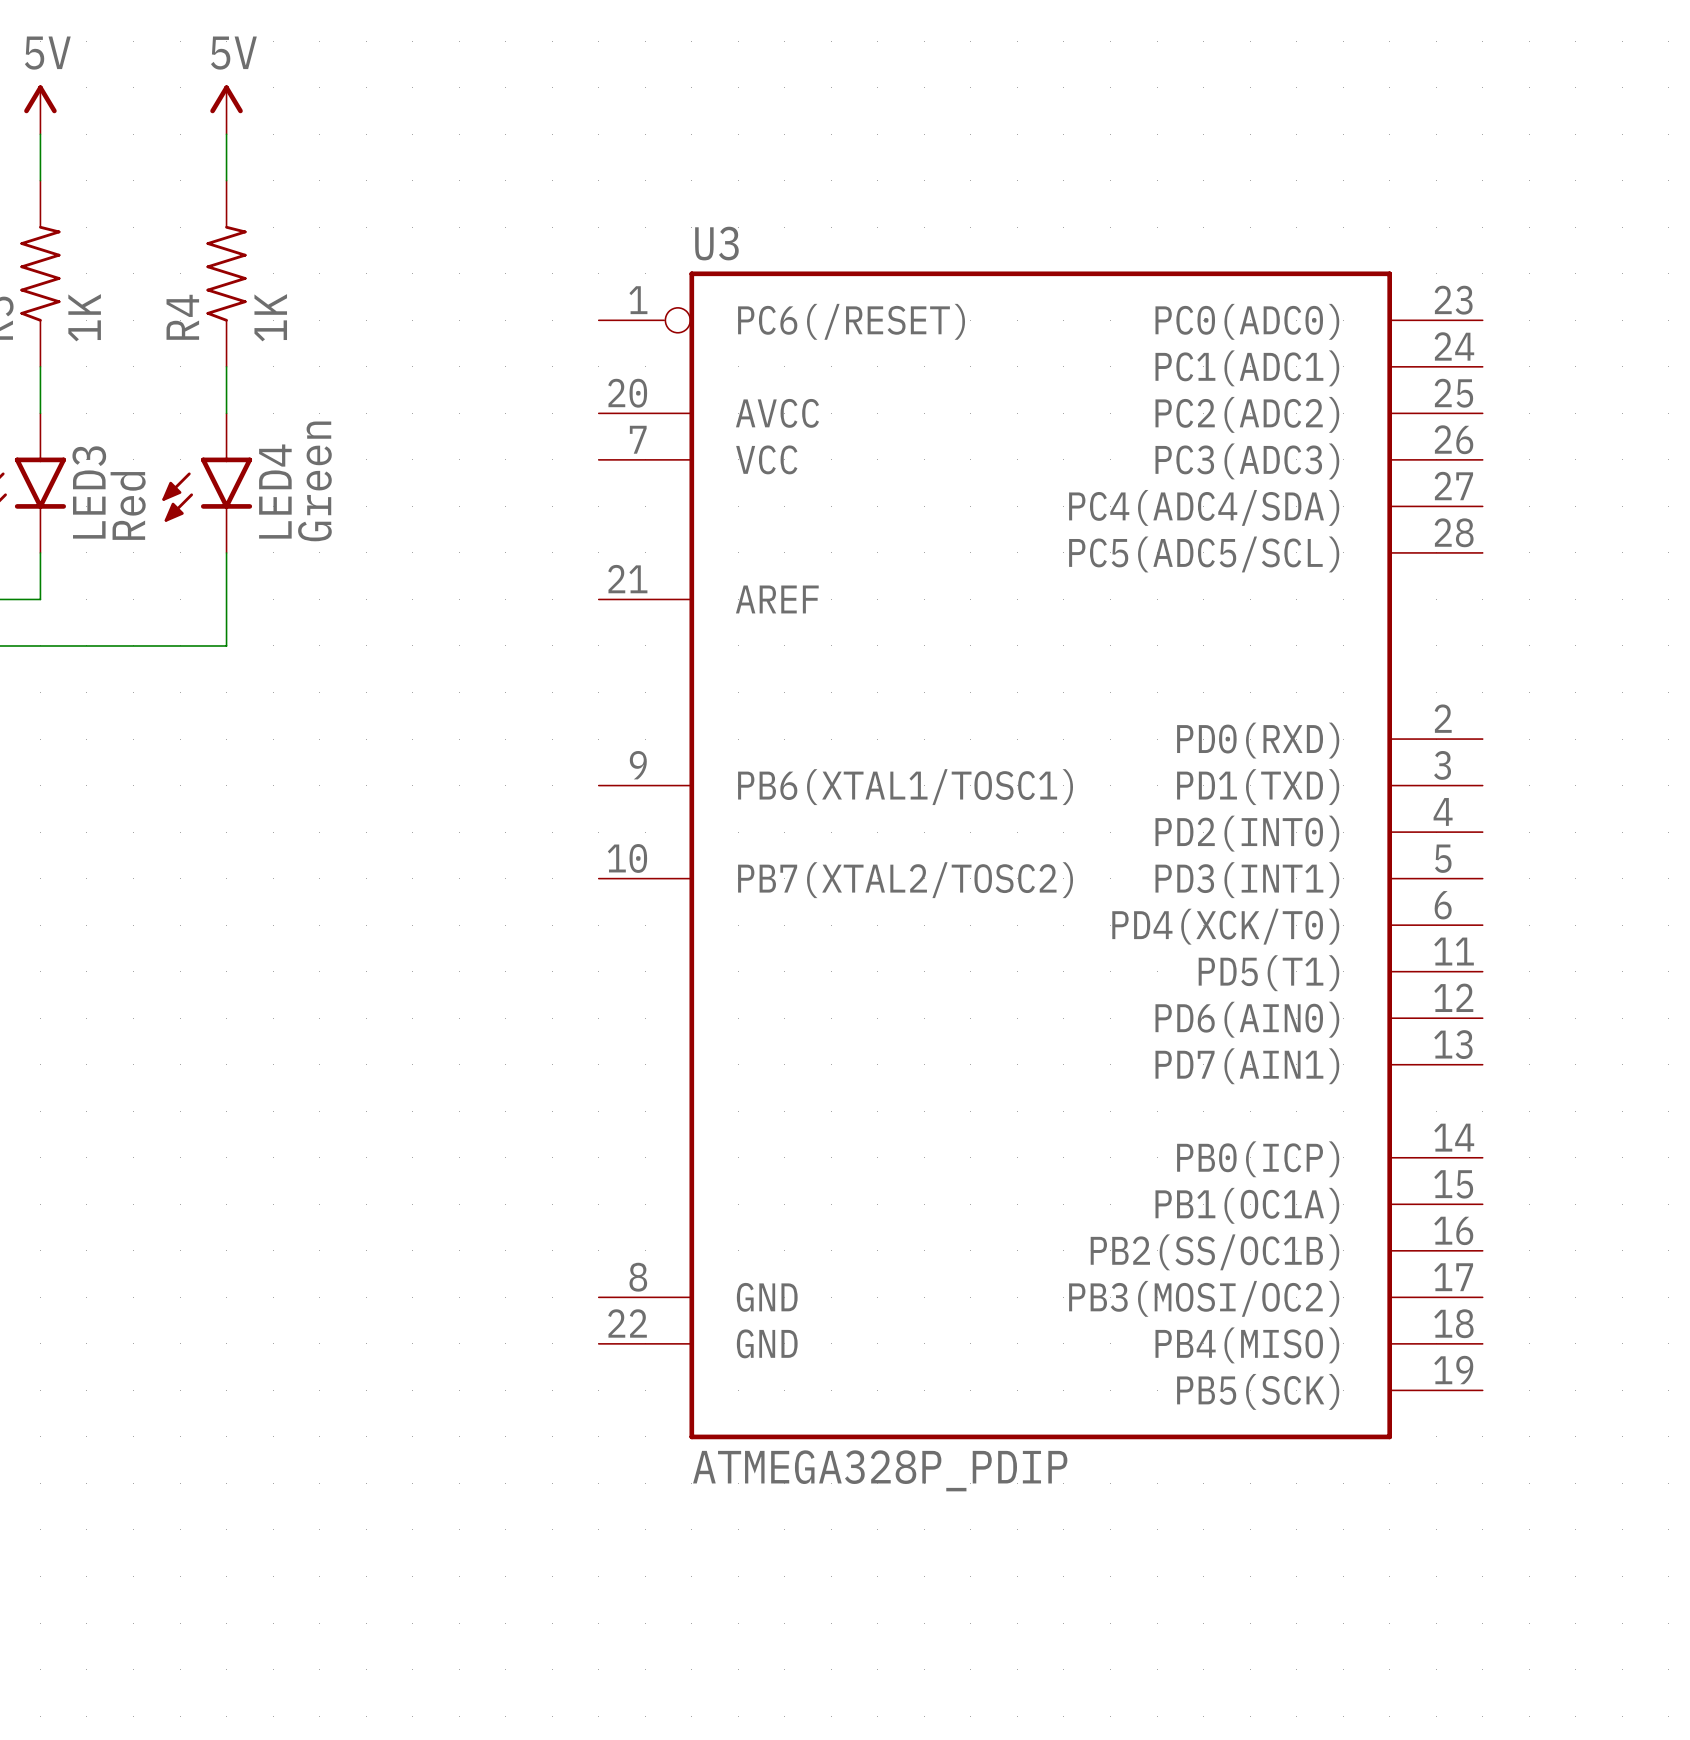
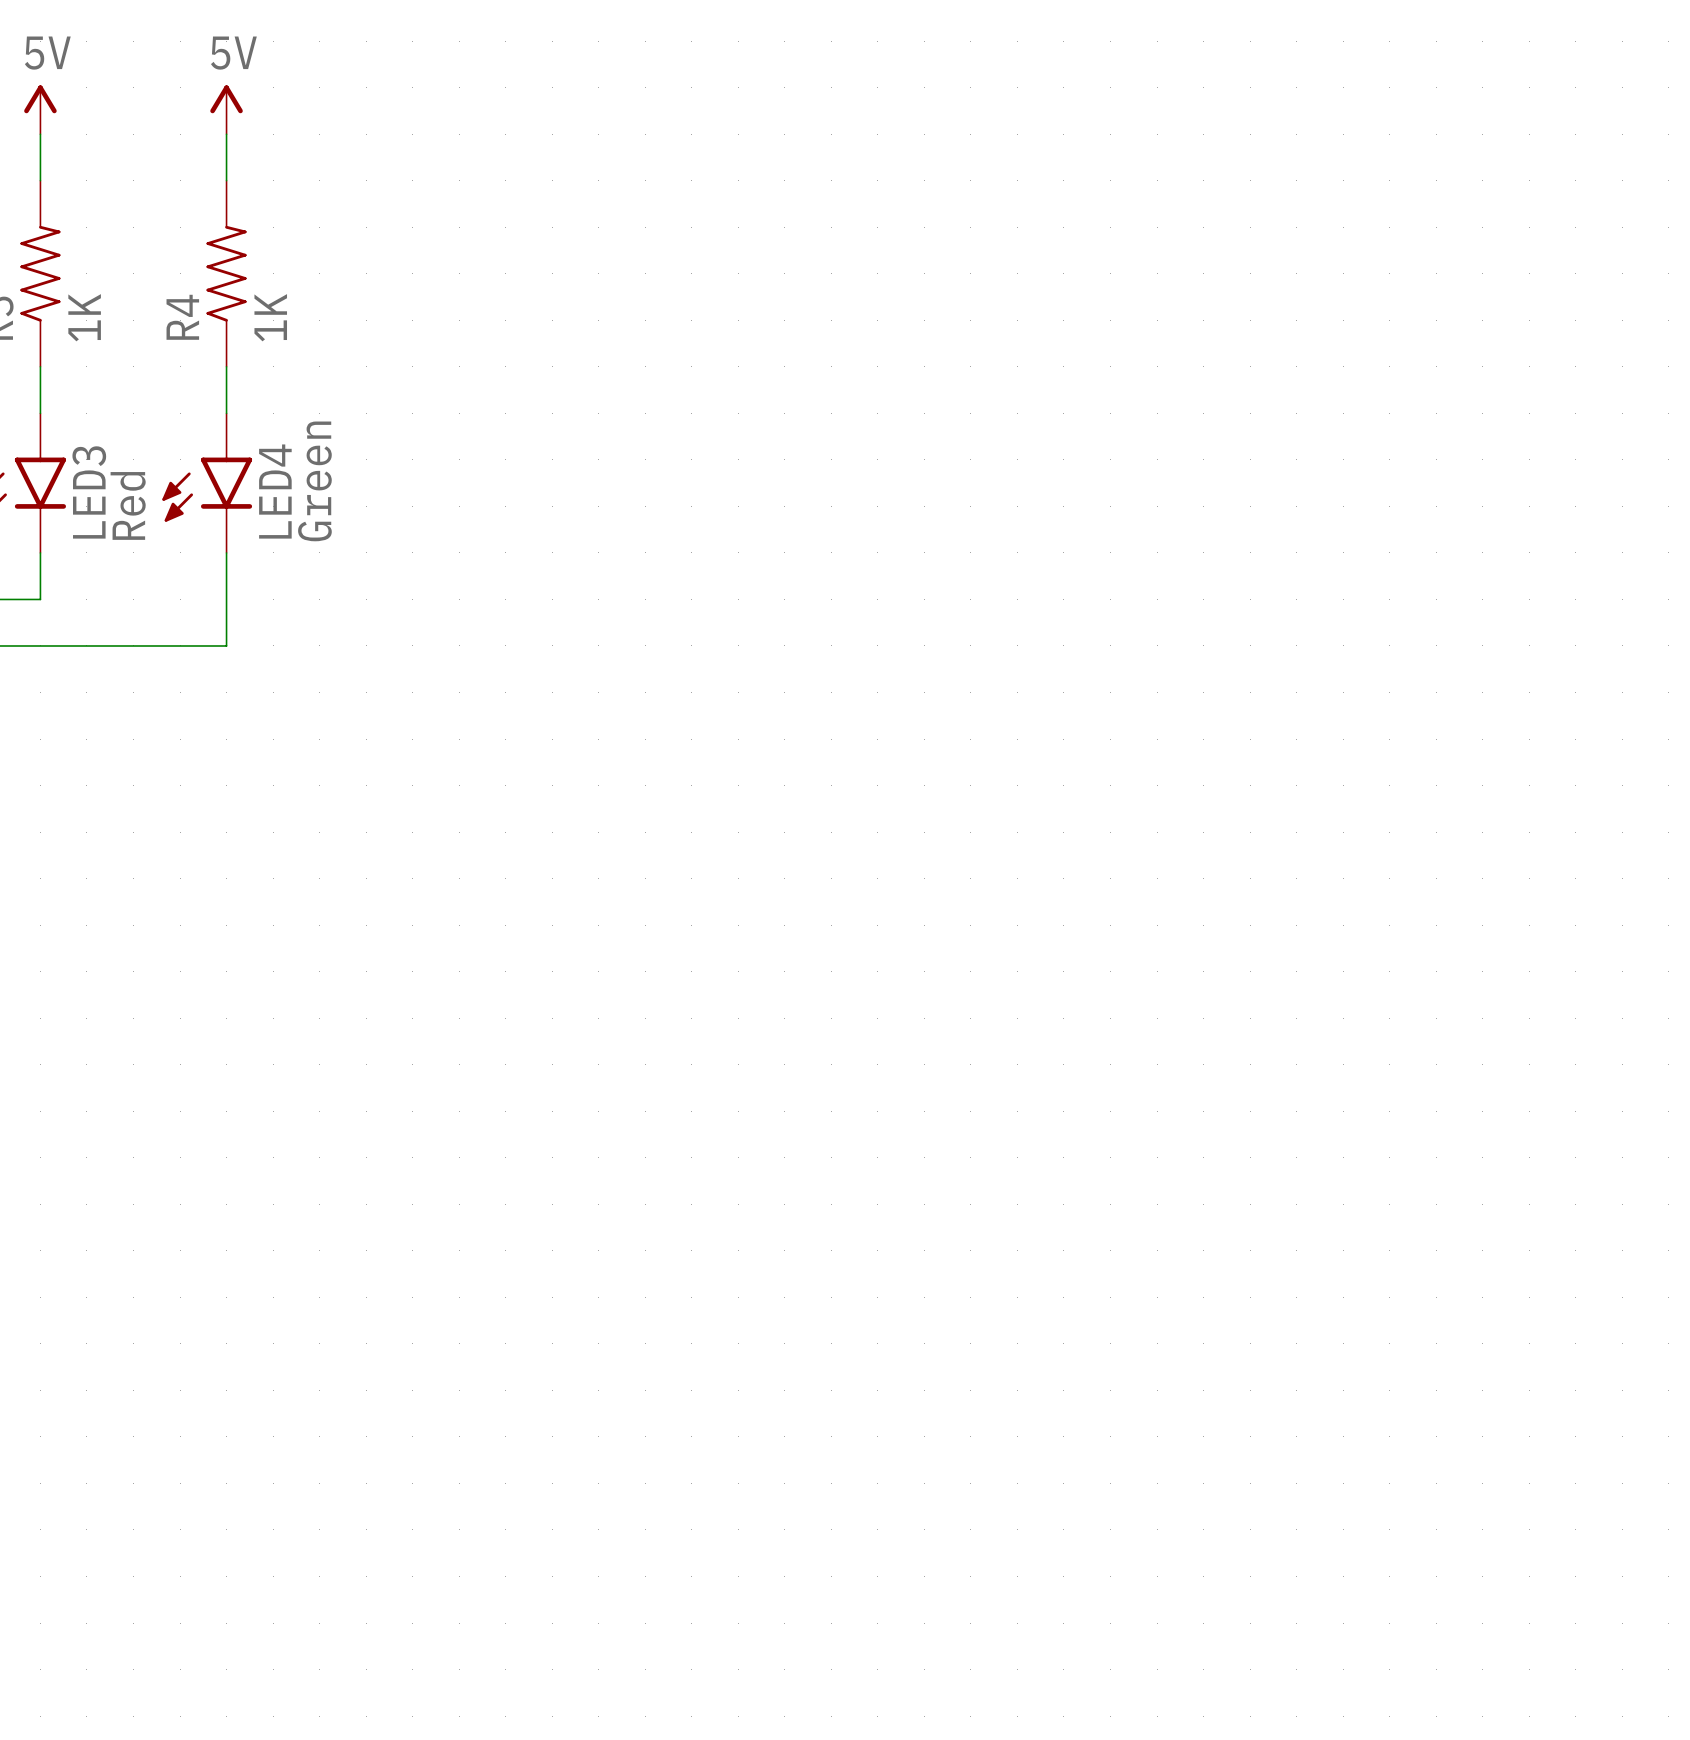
U3: ATMEGA328P_PDIP (1040, 855) -> none

